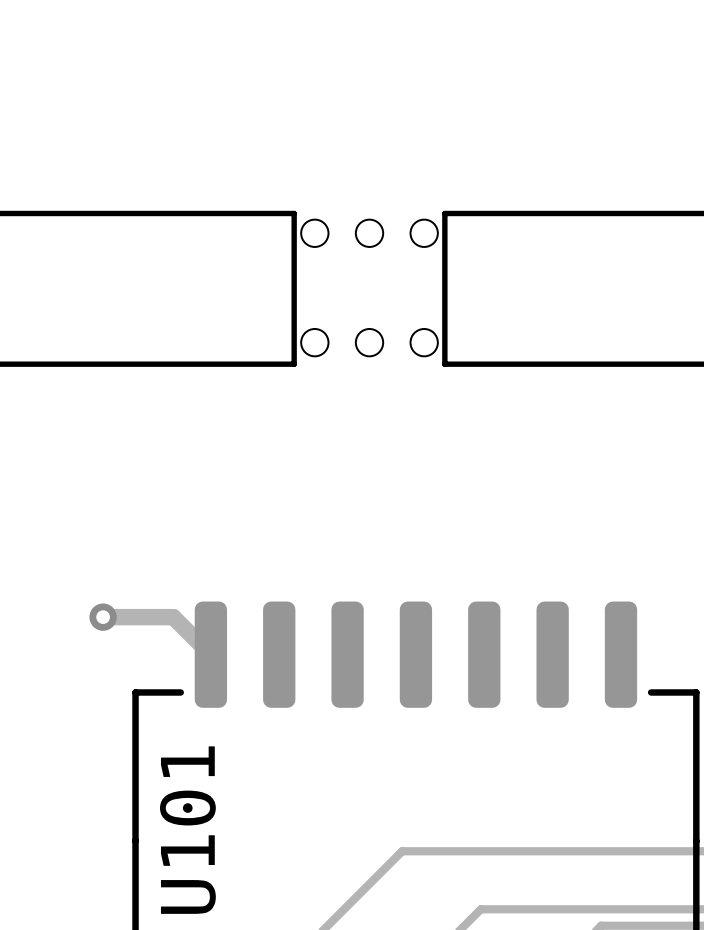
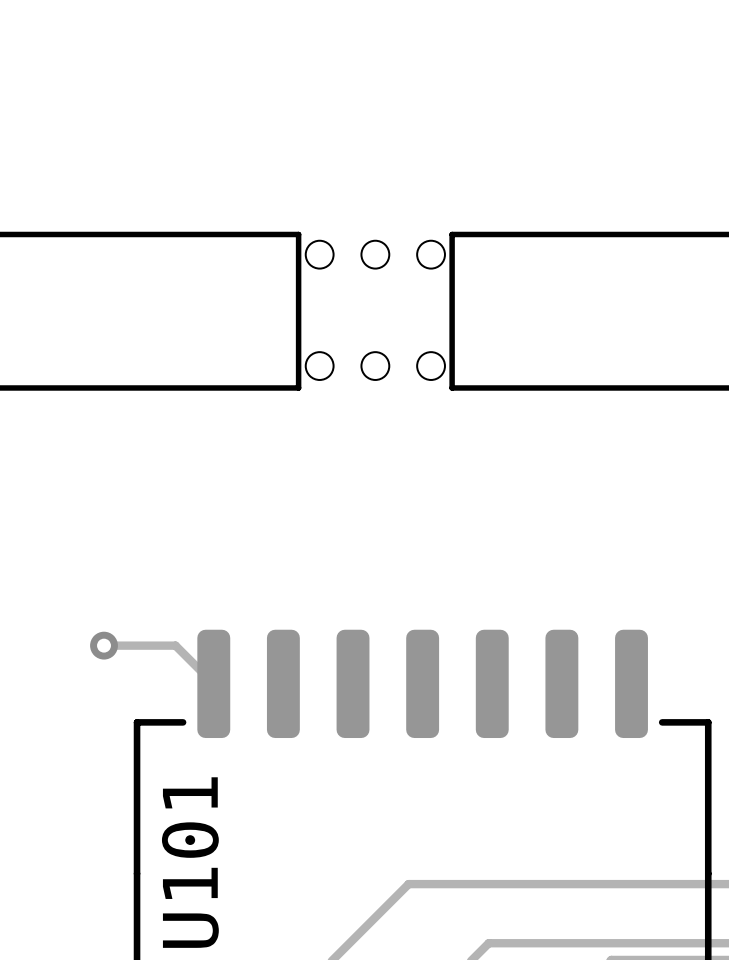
track width: thick (103, 617) (173, 617) (210, 654) -> thin (104, 645) (175, 645) (213, 683)

